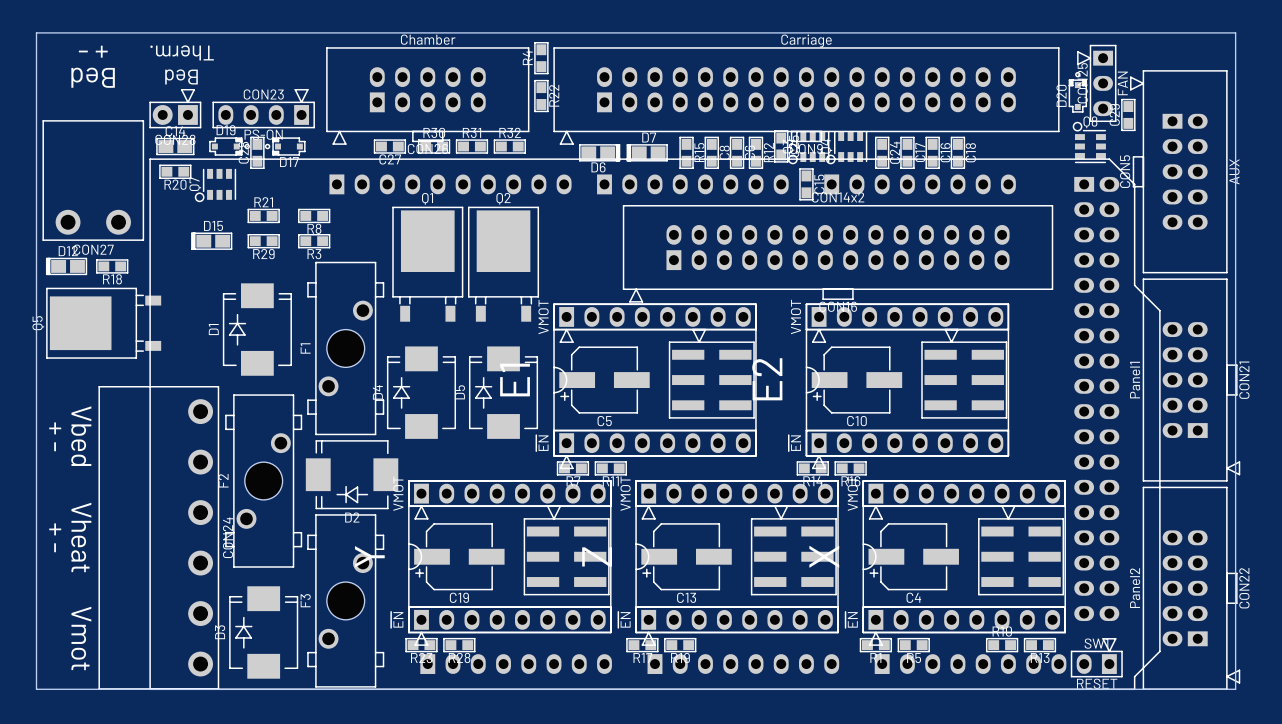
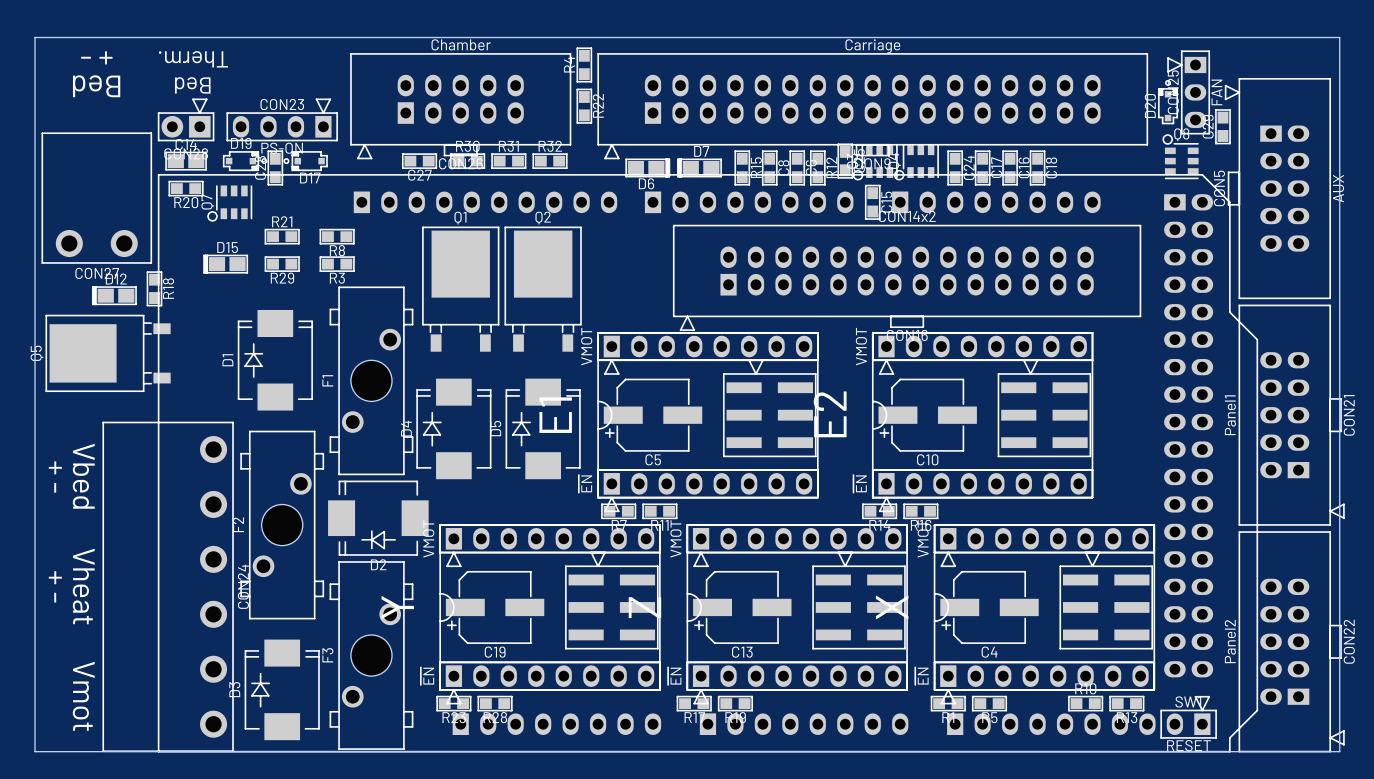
D12 position: (66, 266) -> (114, 295)
R18 rotation: 0° (112, 266) -> 90° counterclockwise (154, 288)
R18 position: (112, 266) -> (154, 288)

